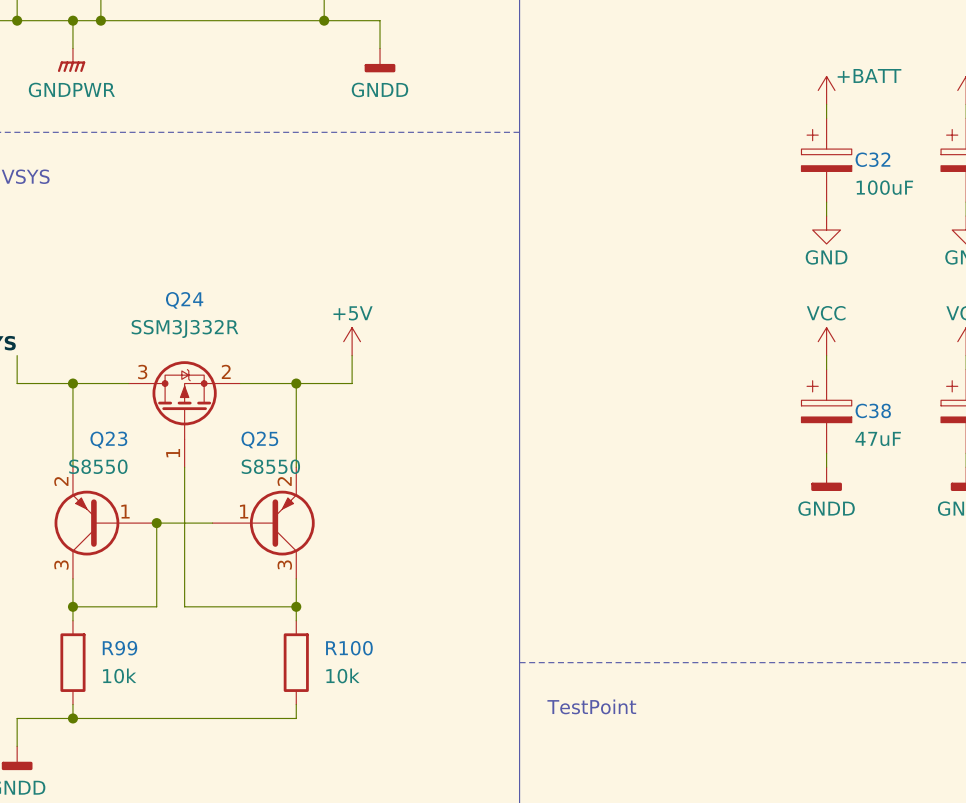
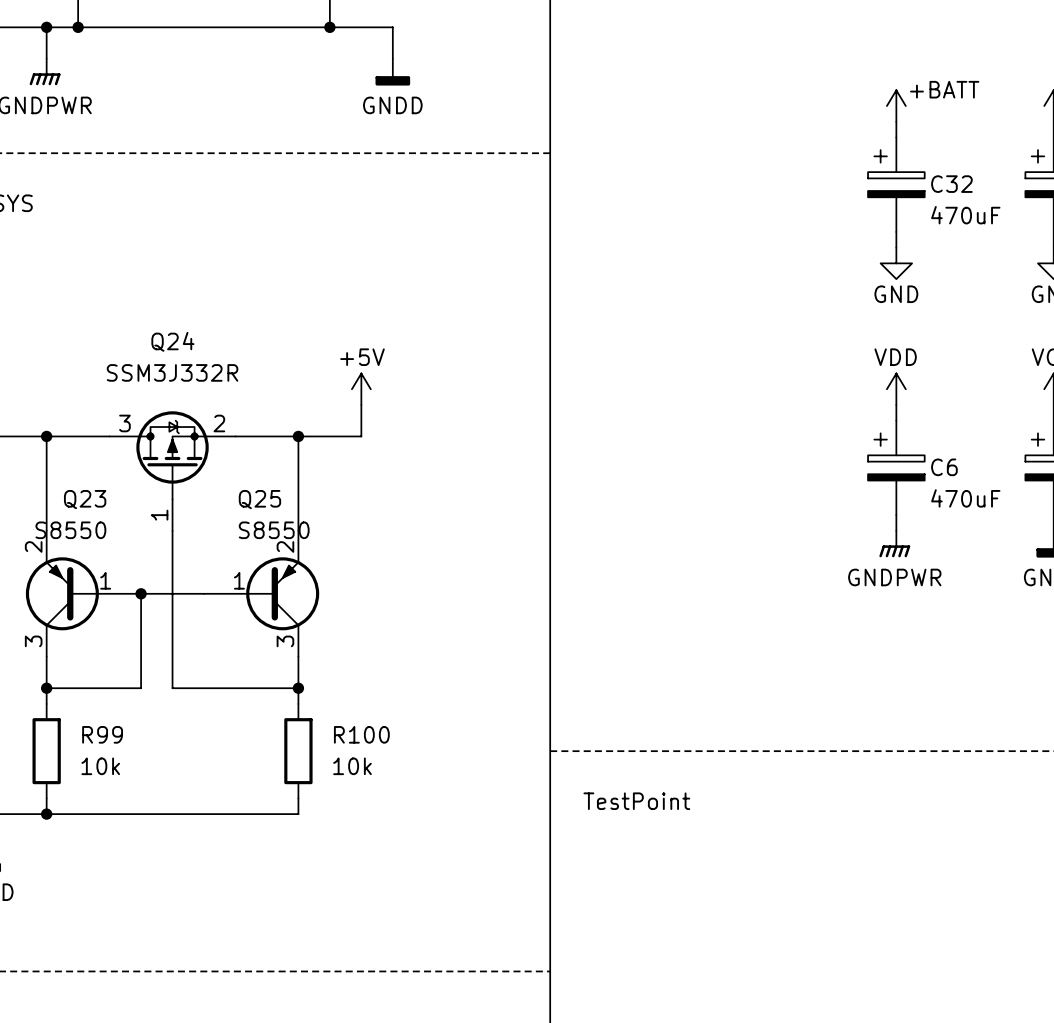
C32 value: 100uF (884, 187) -> 470uF (965, 215)
power symbol: VCC (826, 341) -> VDD (896, 389)
C38 name: C38 (873, 410) -> C6 (944, 467)
C38 value: 47uF (878, 438) -> 470uF (965, 498)
power symbol: GNDD (826, 479) -> GNDPWR (894, 544)

